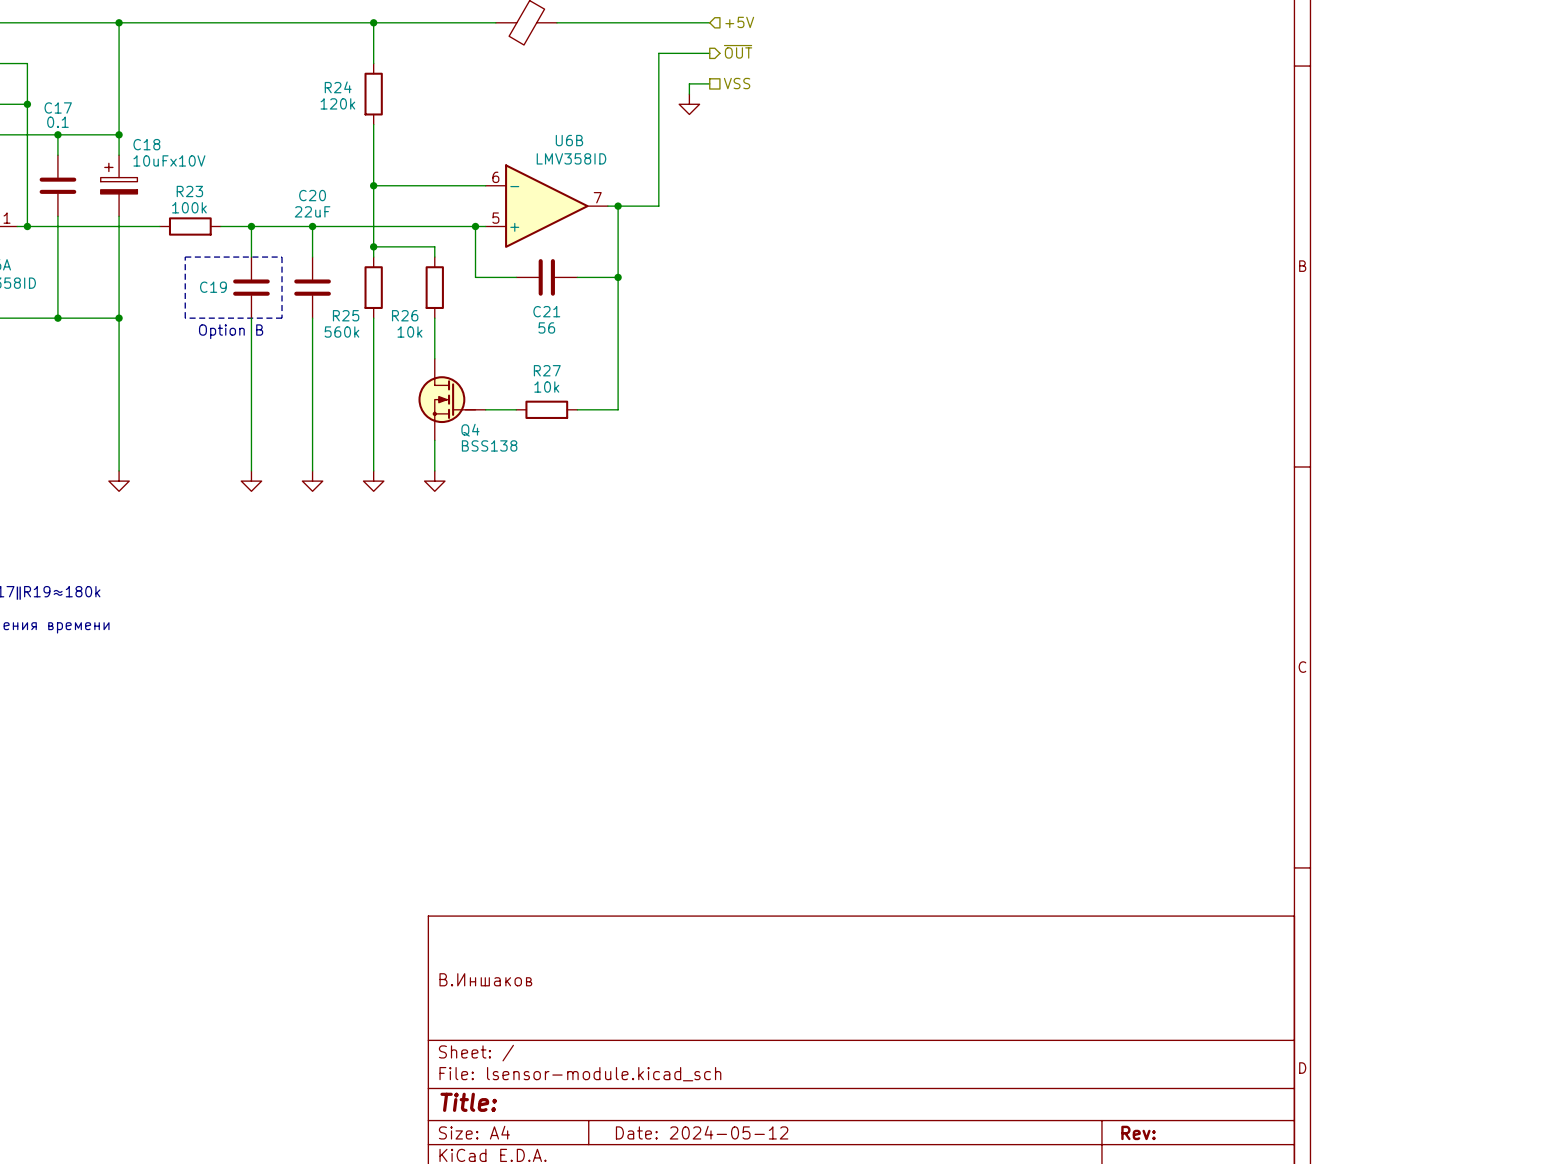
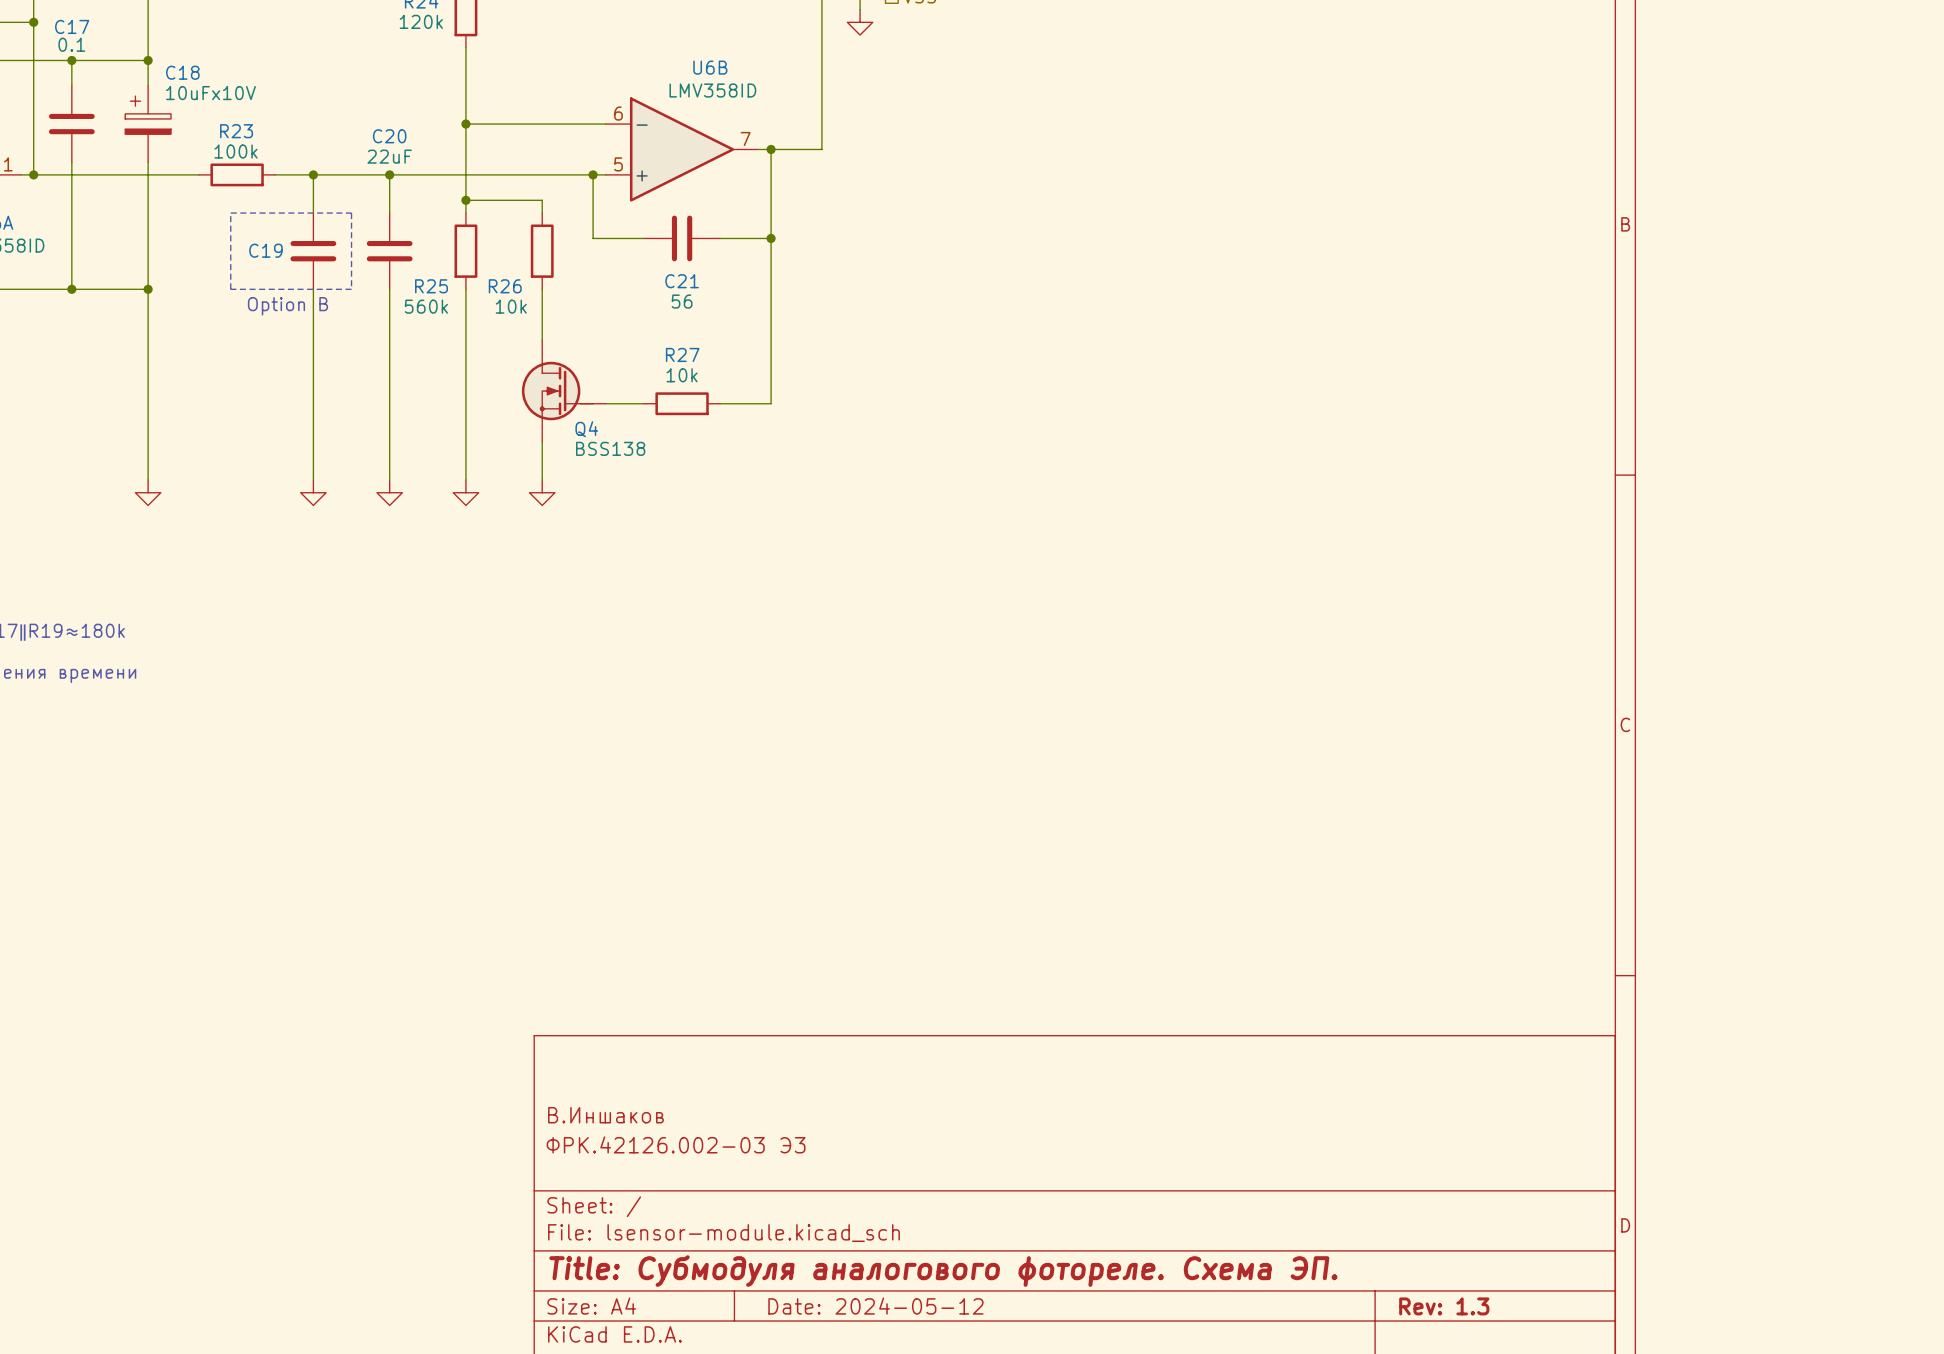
title block: none -> ФРК.42126.002-03 Э3 (676, 1144)
title block: Title: (468, 1102) -> Title: Субмодуля аналогового фотореле. Схема ЭП. (943, 1271)
title block: Rev: (1138, 1132) -> Rev: 1.3 (1444, 1306)

